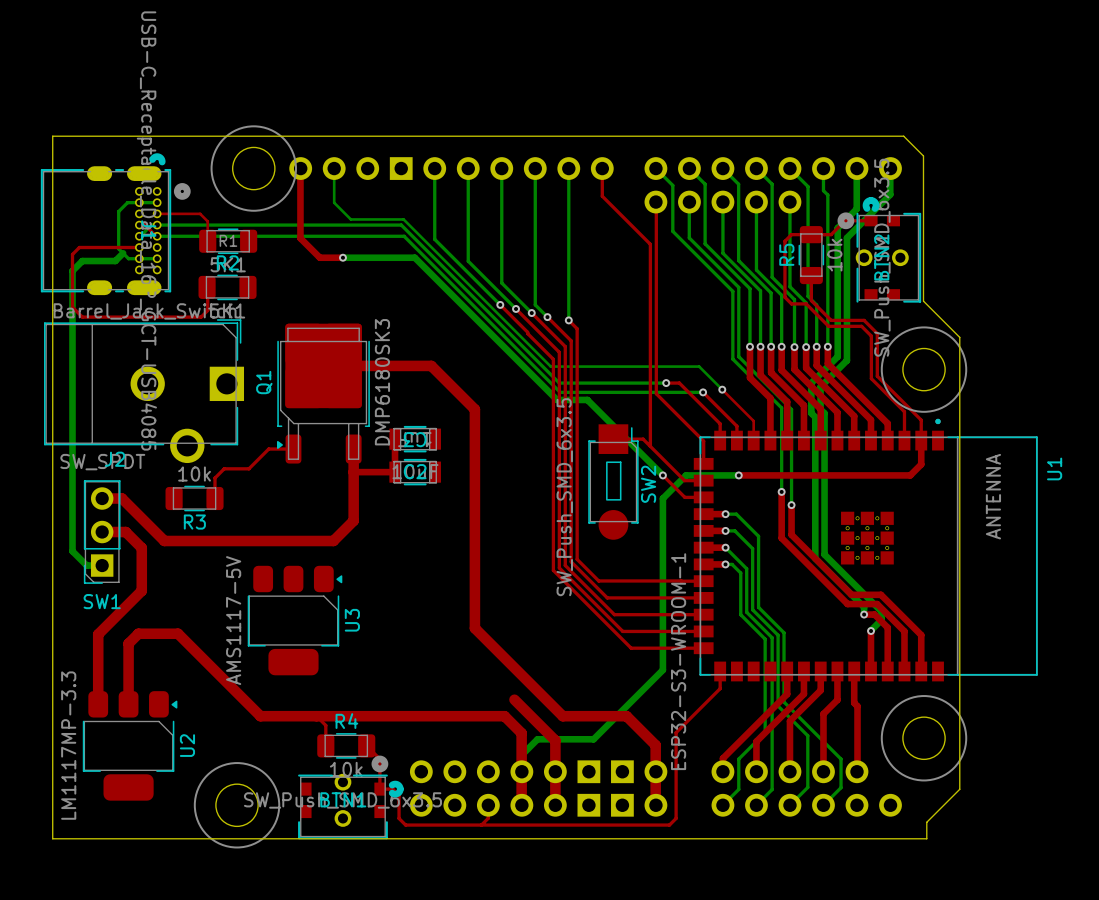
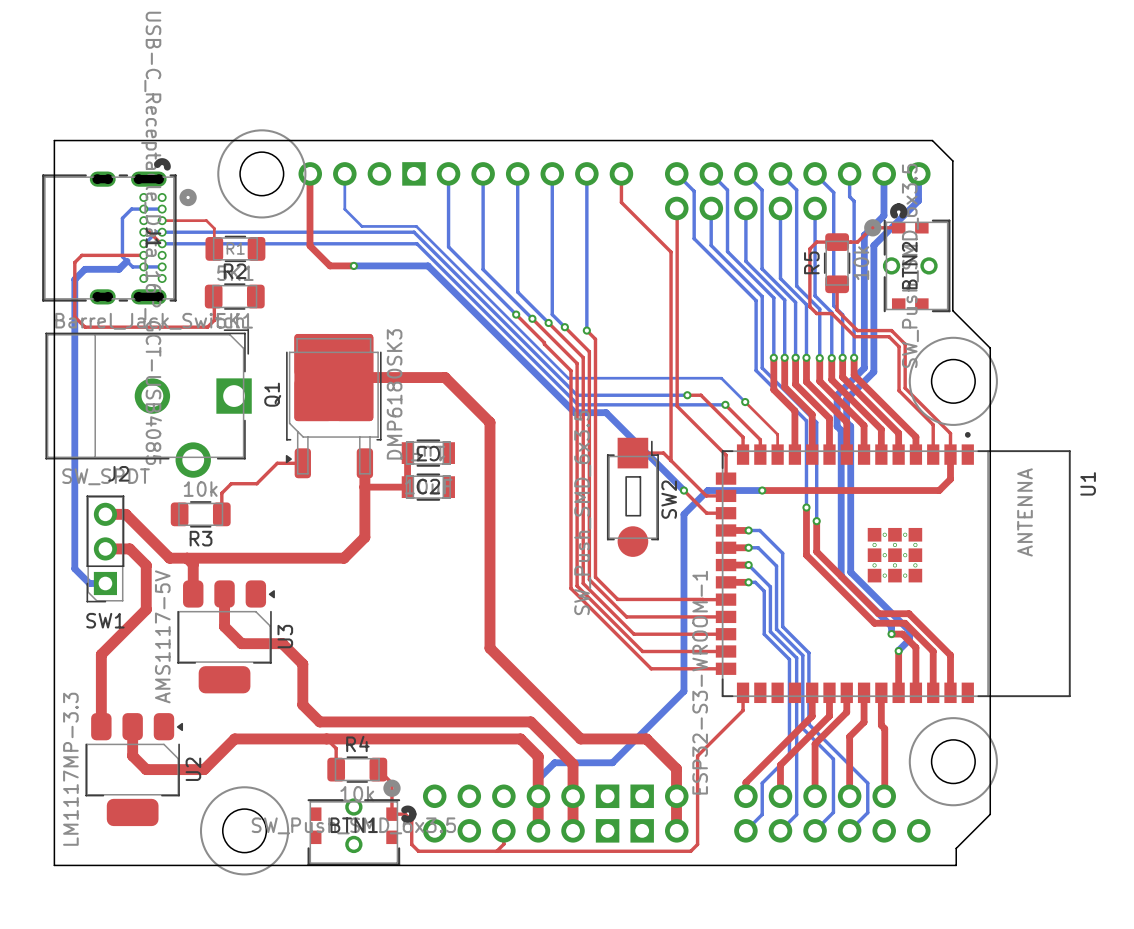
top track: none -> (187, 558) (193, 564) (193, 593)
top track: none -> (224, 593) (224, 626) (241, 643) (282, 643) (302, 664) (302, 704) (319, 721) (530, 721)
U3 position: (295, 620) -> (226, 636)
top track: (128, 704) (128, 643) (138, 633) (178, 633) (260, 716) -> (132, 726) (132, 755) (146, 769) (204, 769) (234, 738) (268, 738)

